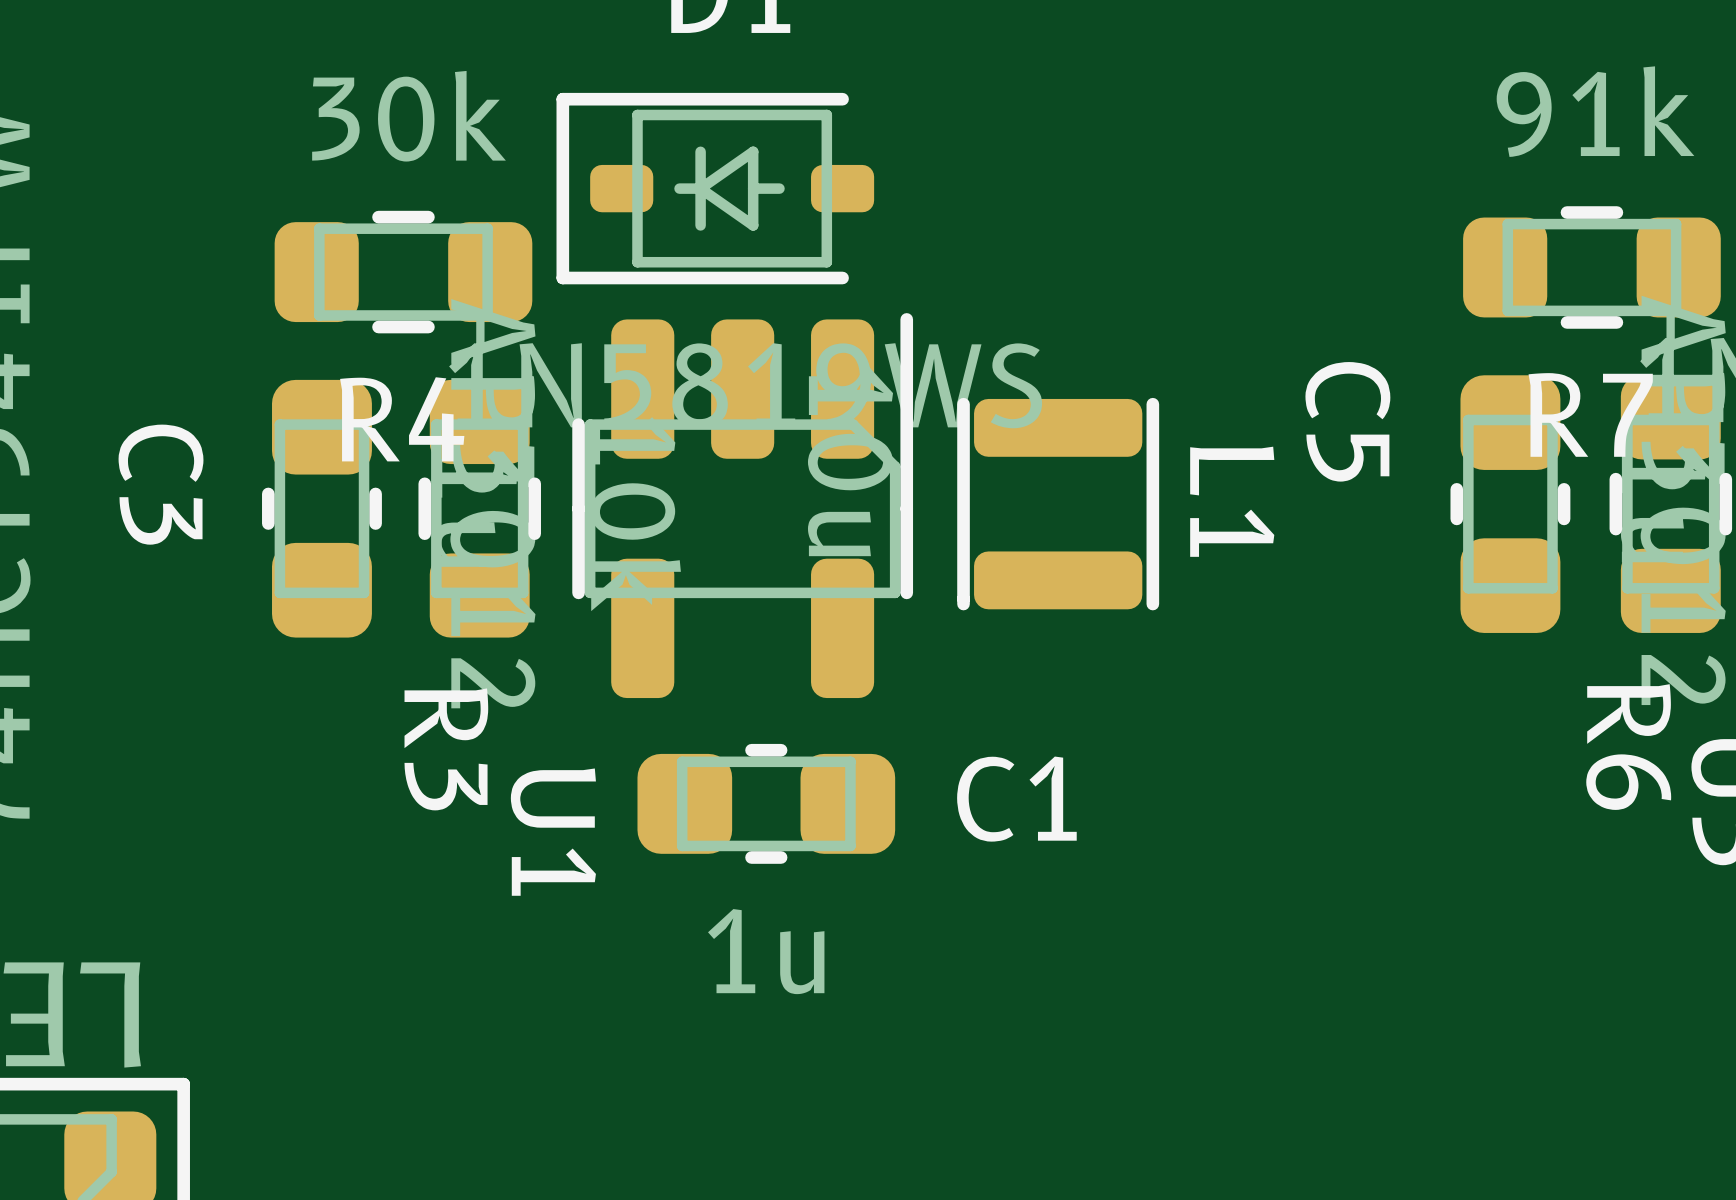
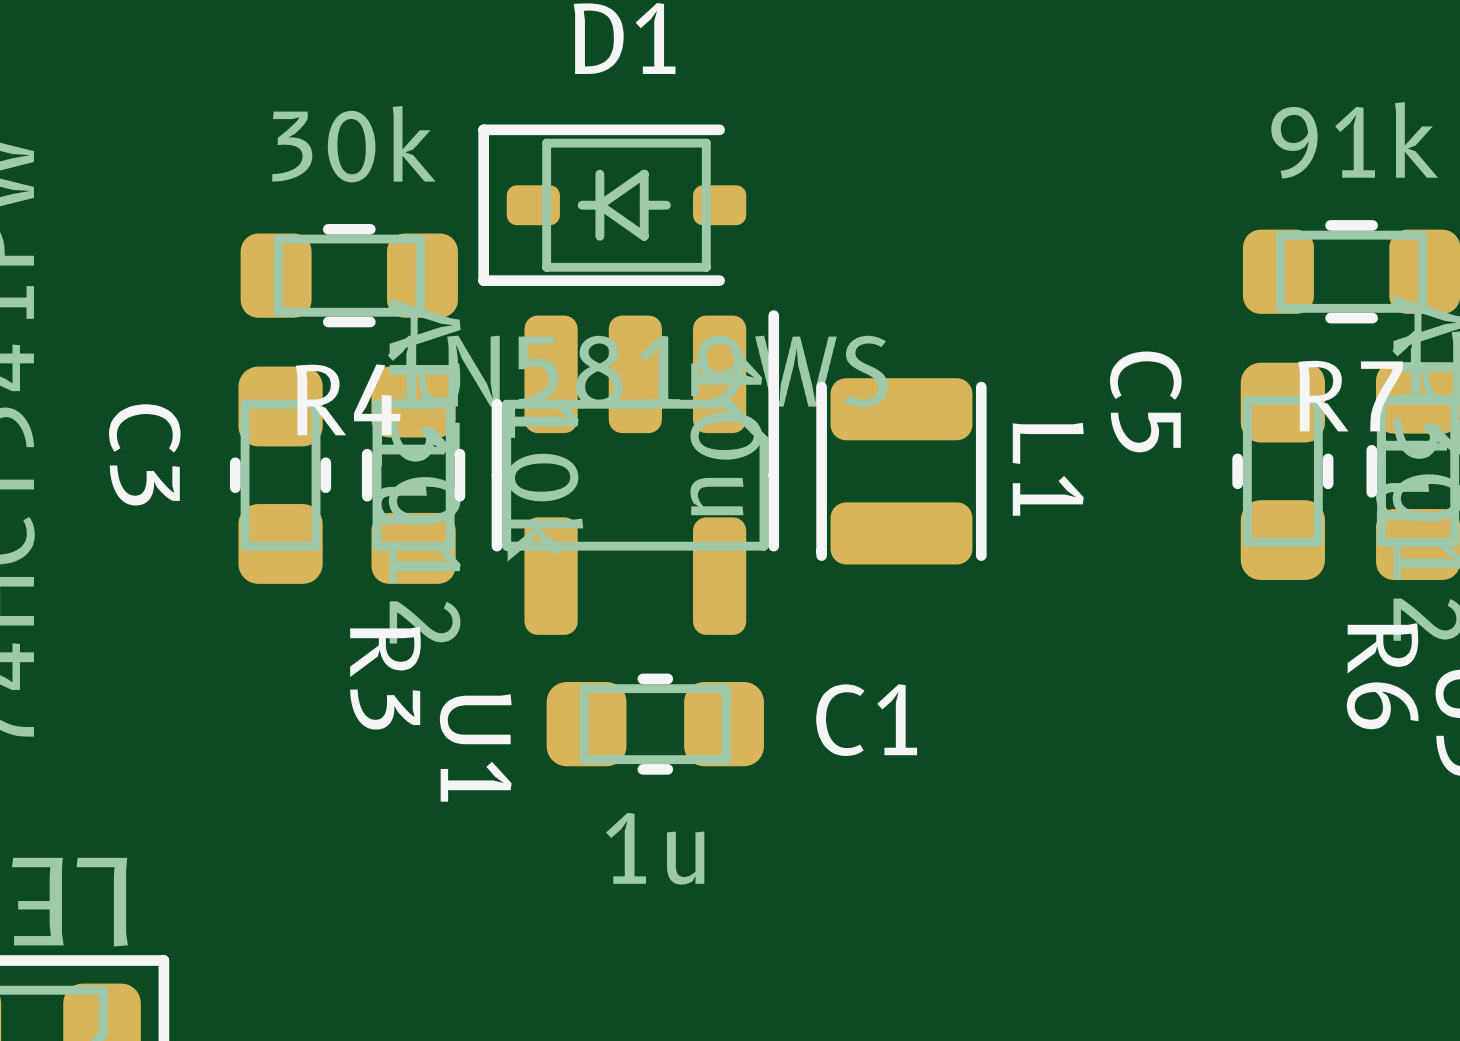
L1 footprint: [957, 397, 1160, 611] -> [816, 378, 987, 565]

